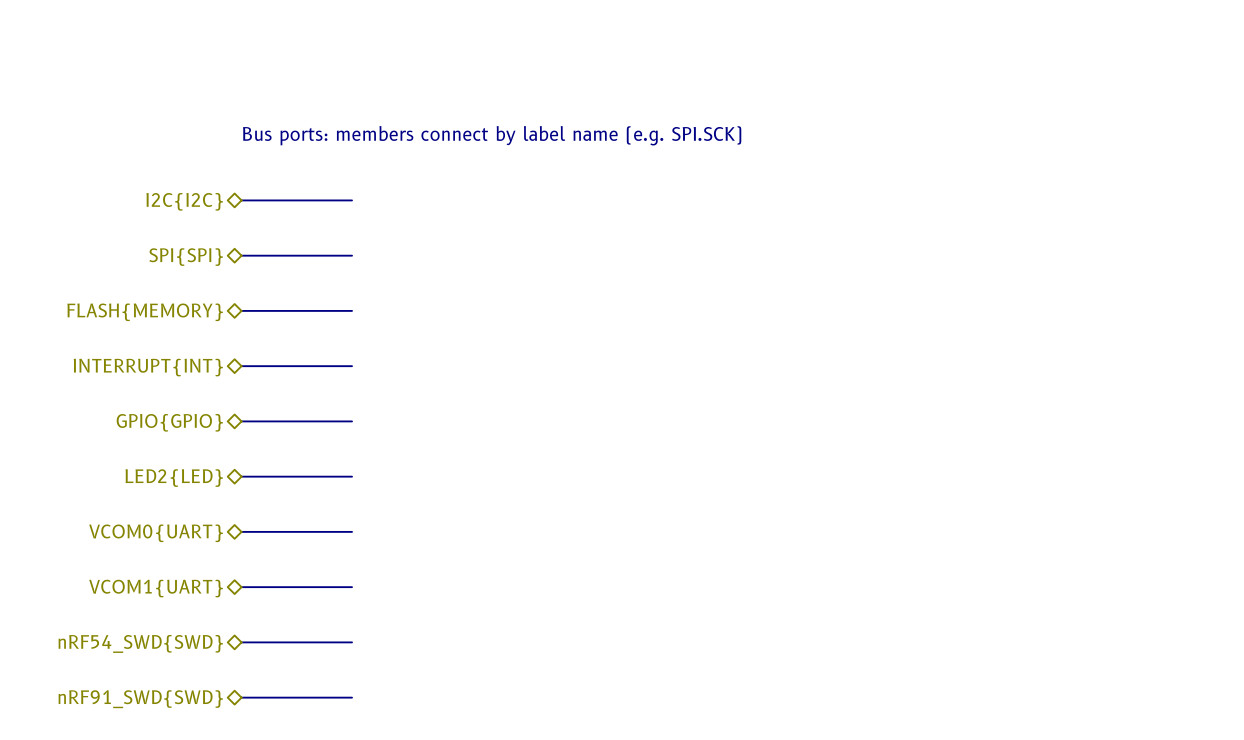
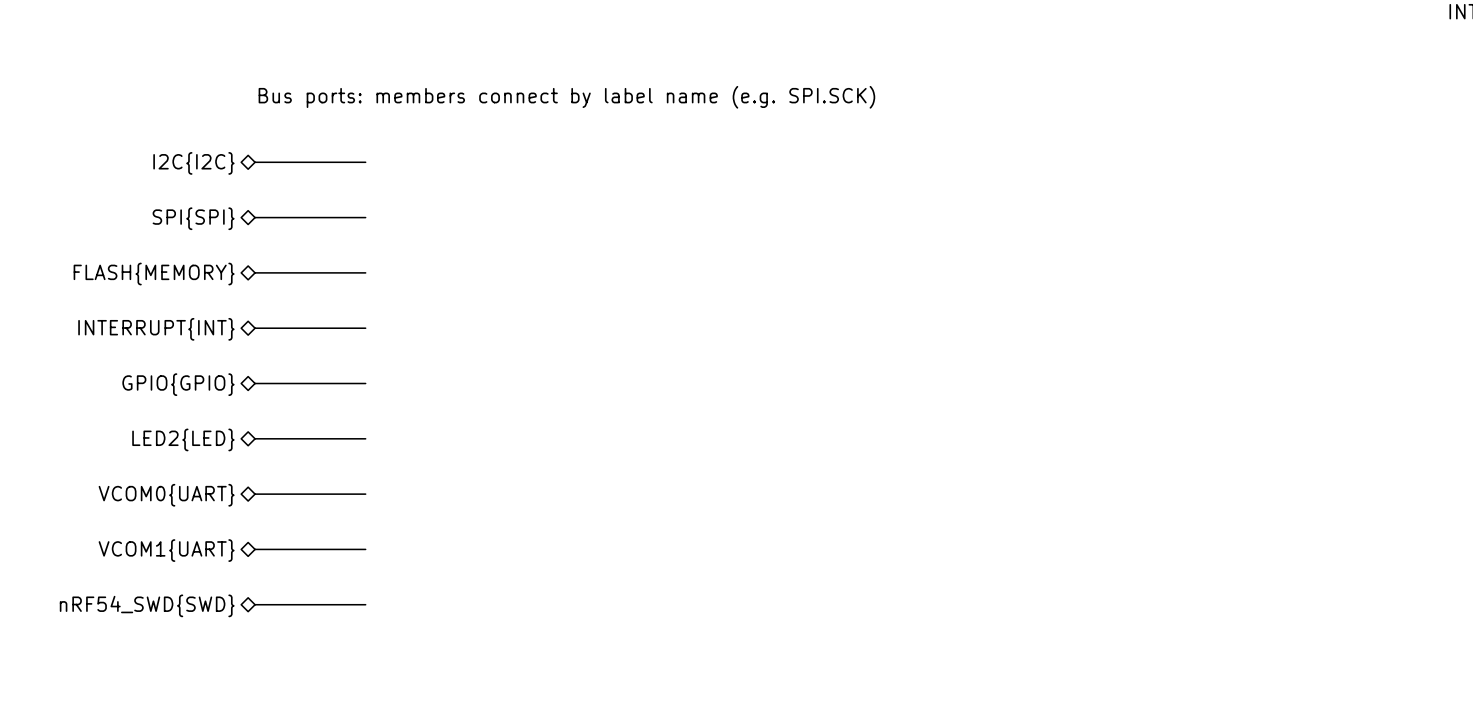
bus: (241, 697) (352, 697) -> none
hierarchical label: nRF91_SWD{SWD} (140, 699) -> none

